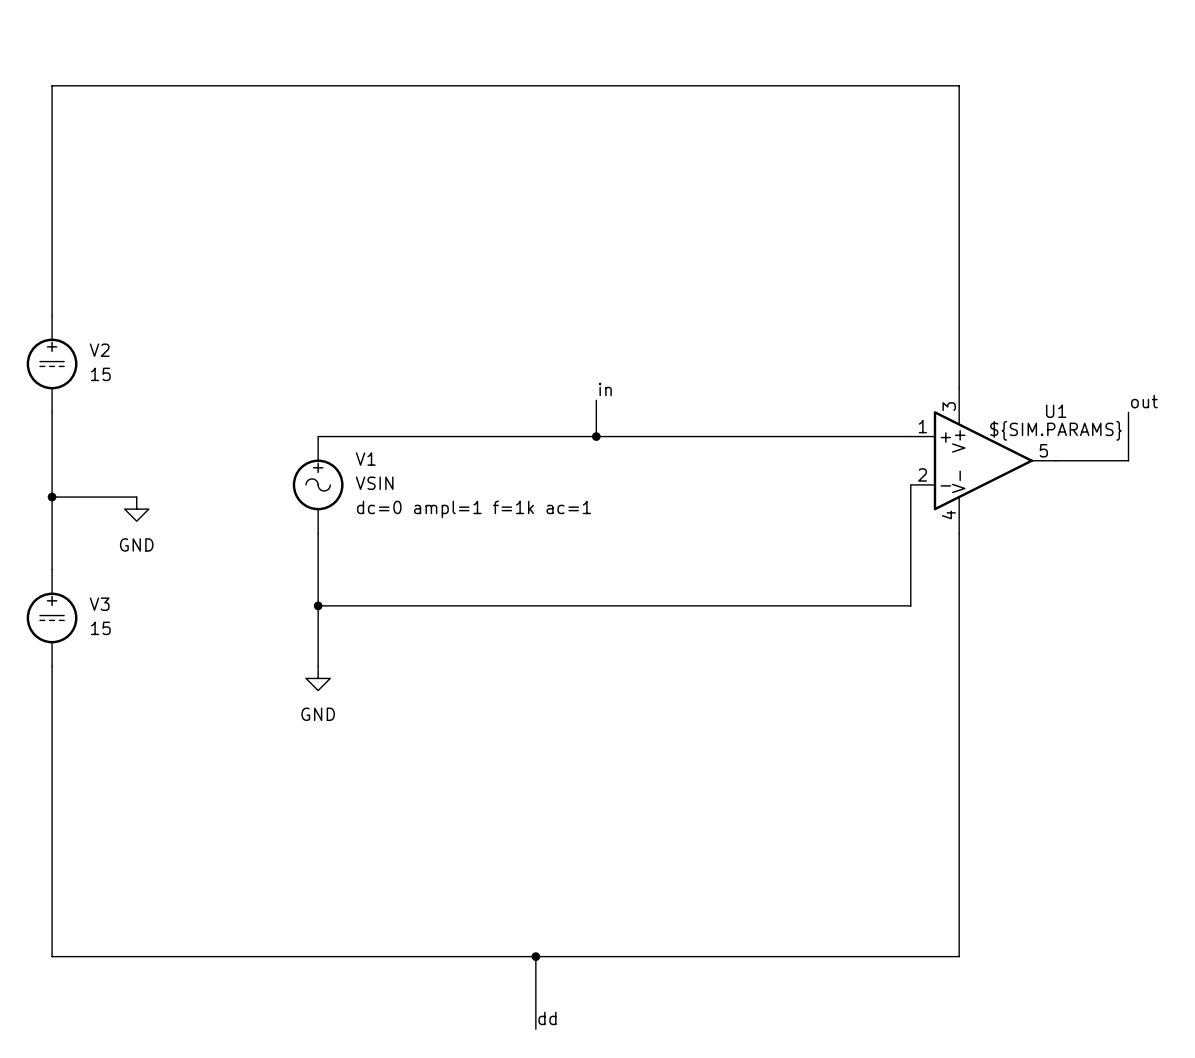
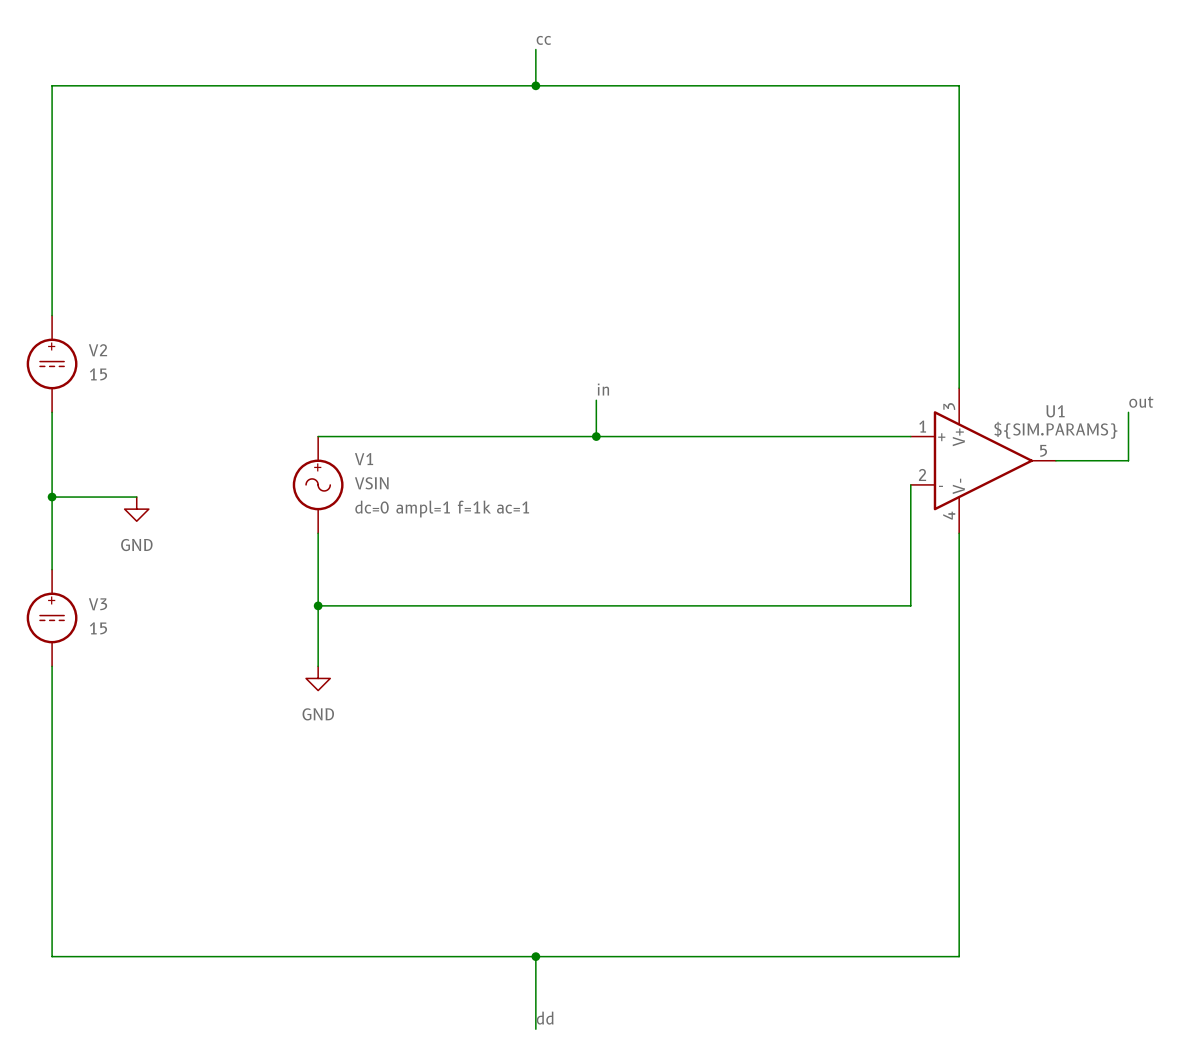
label: none -> cc (543, 40)
wire: none -> (535, 49) (535, 85)
junction: none -> (535, 85)

